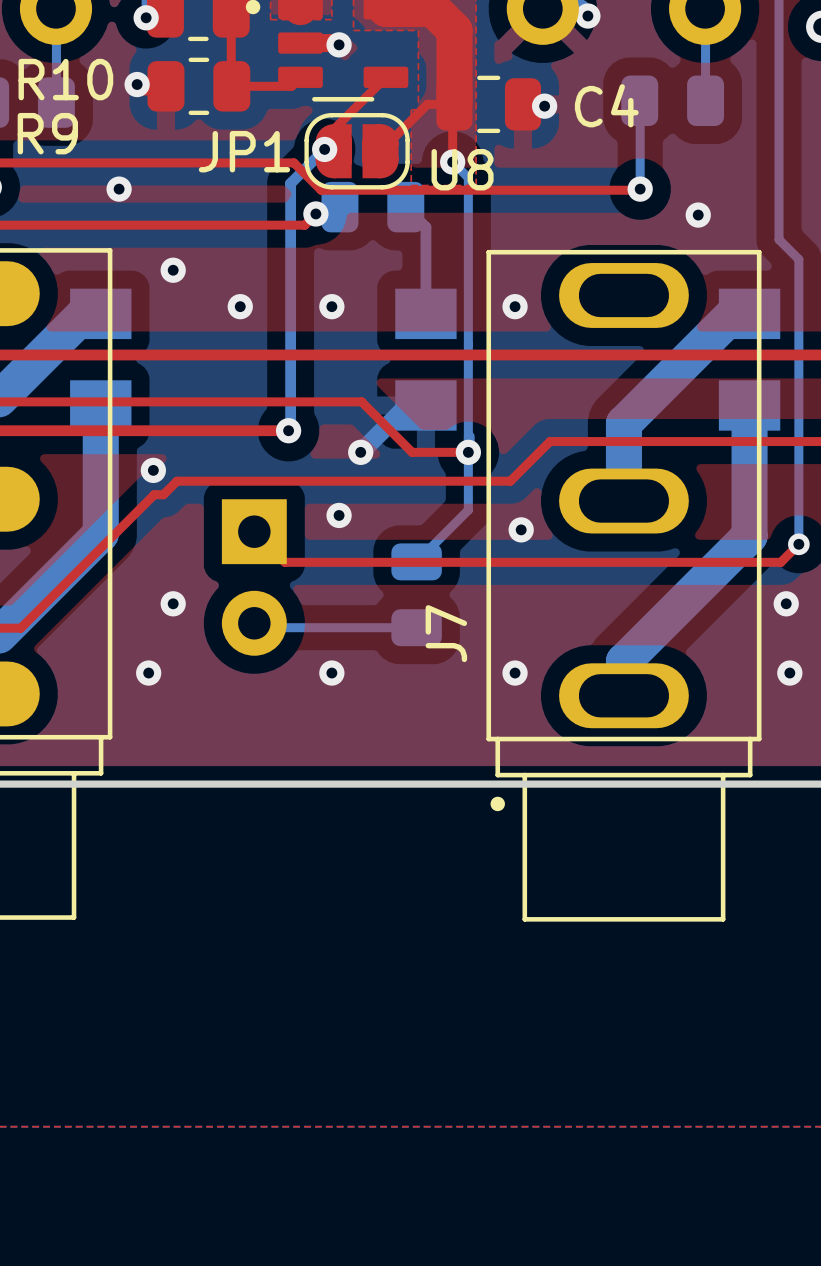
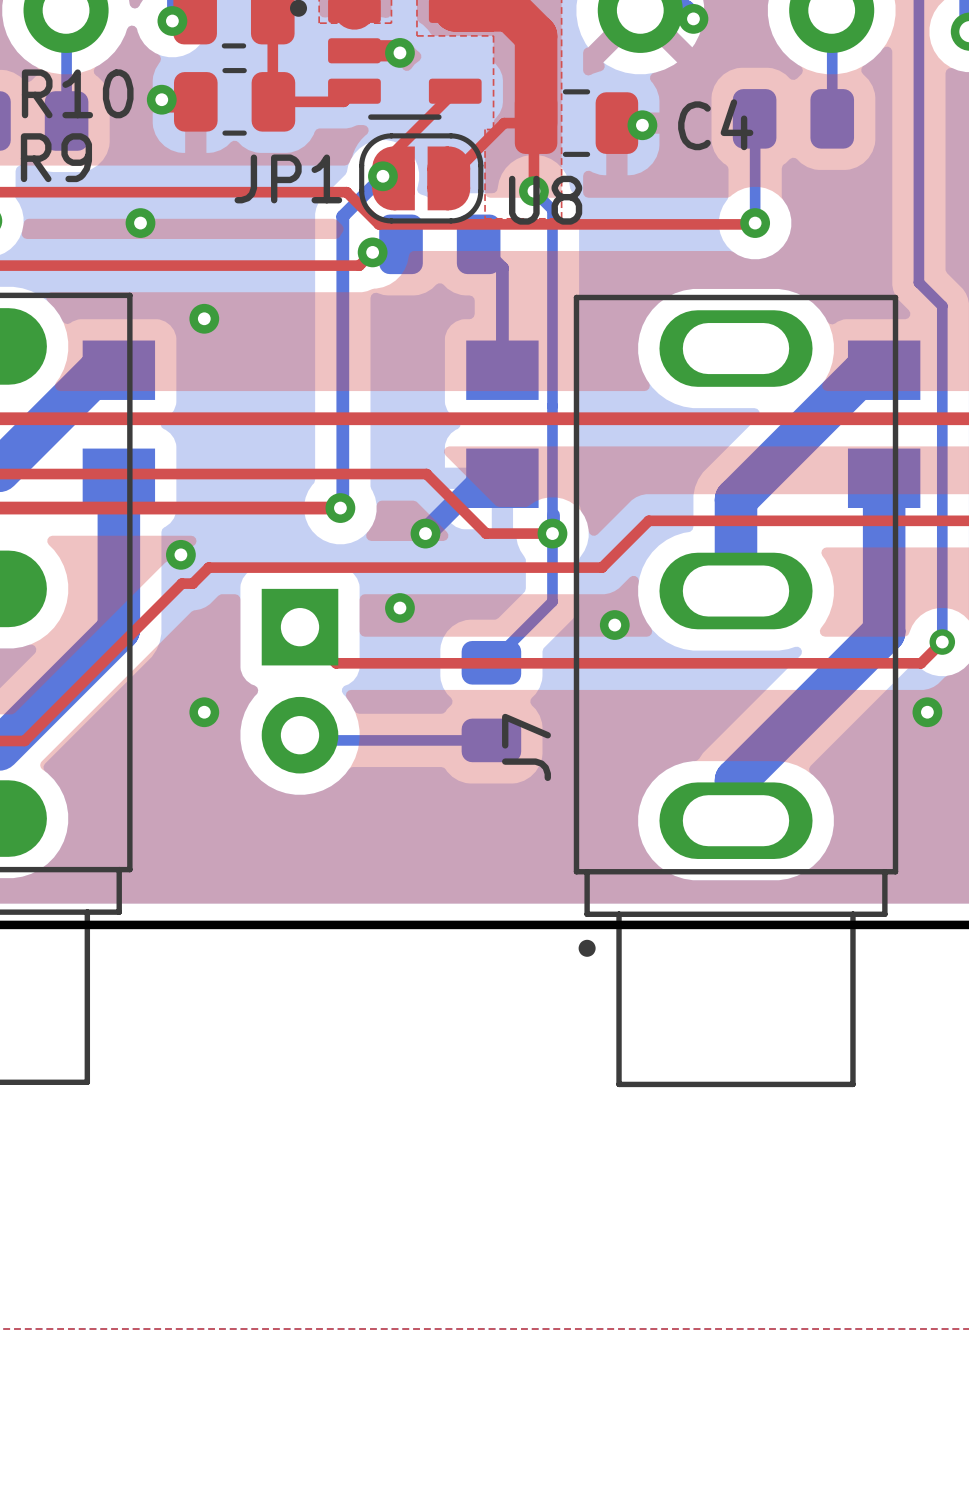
via: (698, 215) -> none
via: (240, 306) -> none
via: (331, 306) -> none
via: (515, 306) -> none
via: (148, 673) -> none
via: (331, 673) -> none
via: (515, 673) -> none
via: (789, 673) -> none

